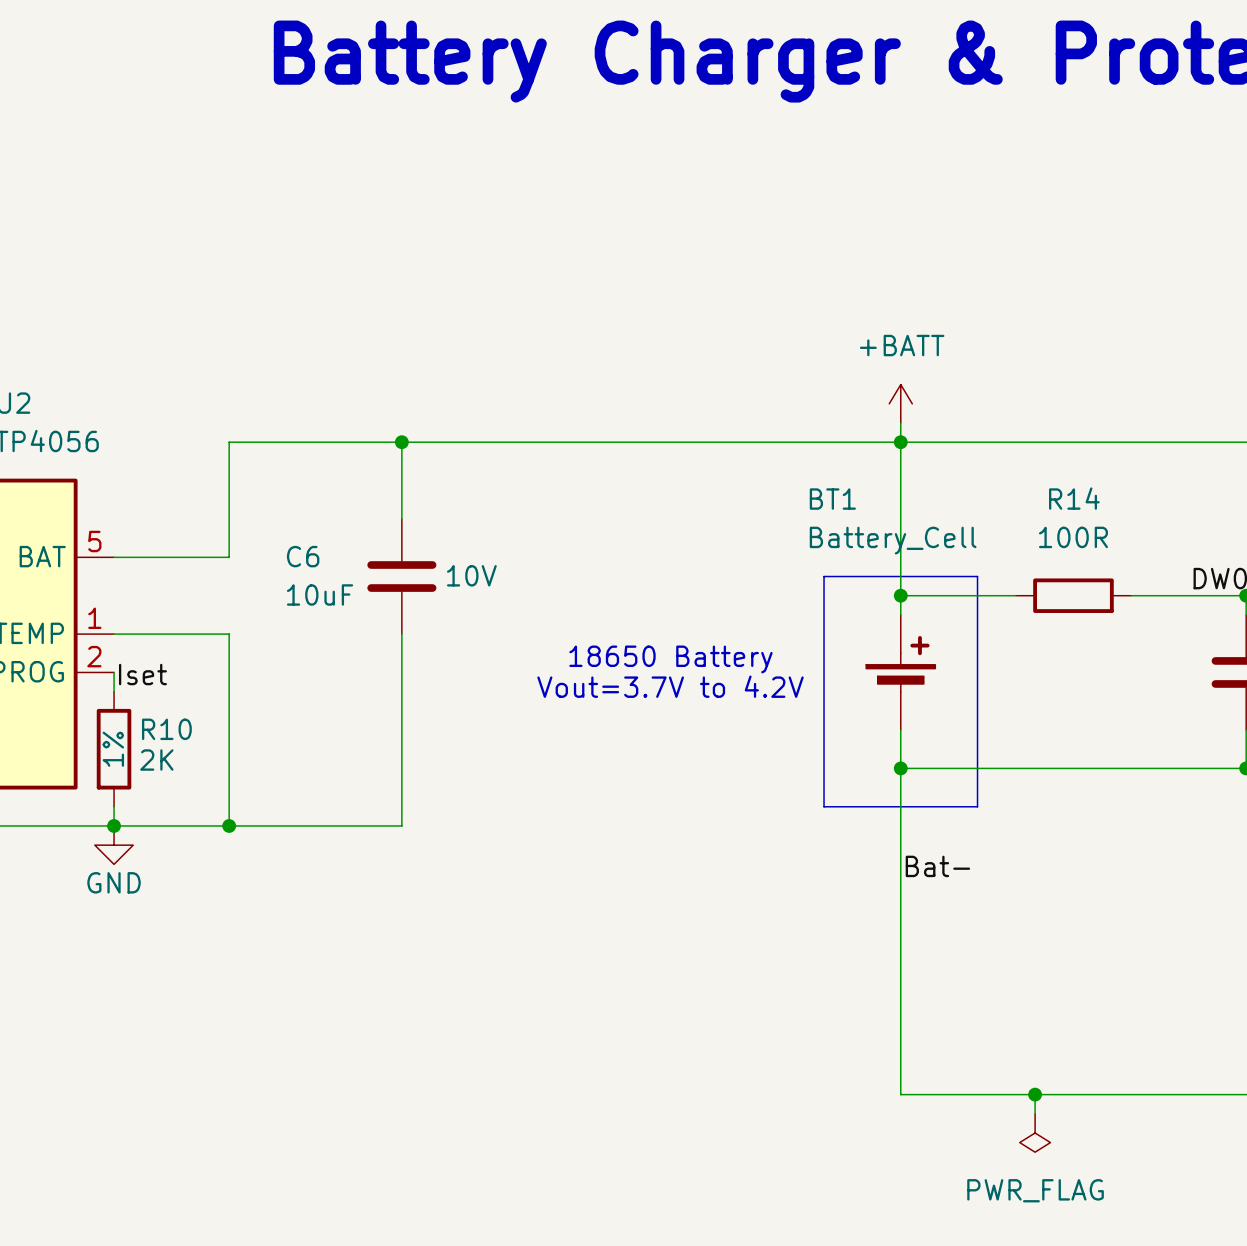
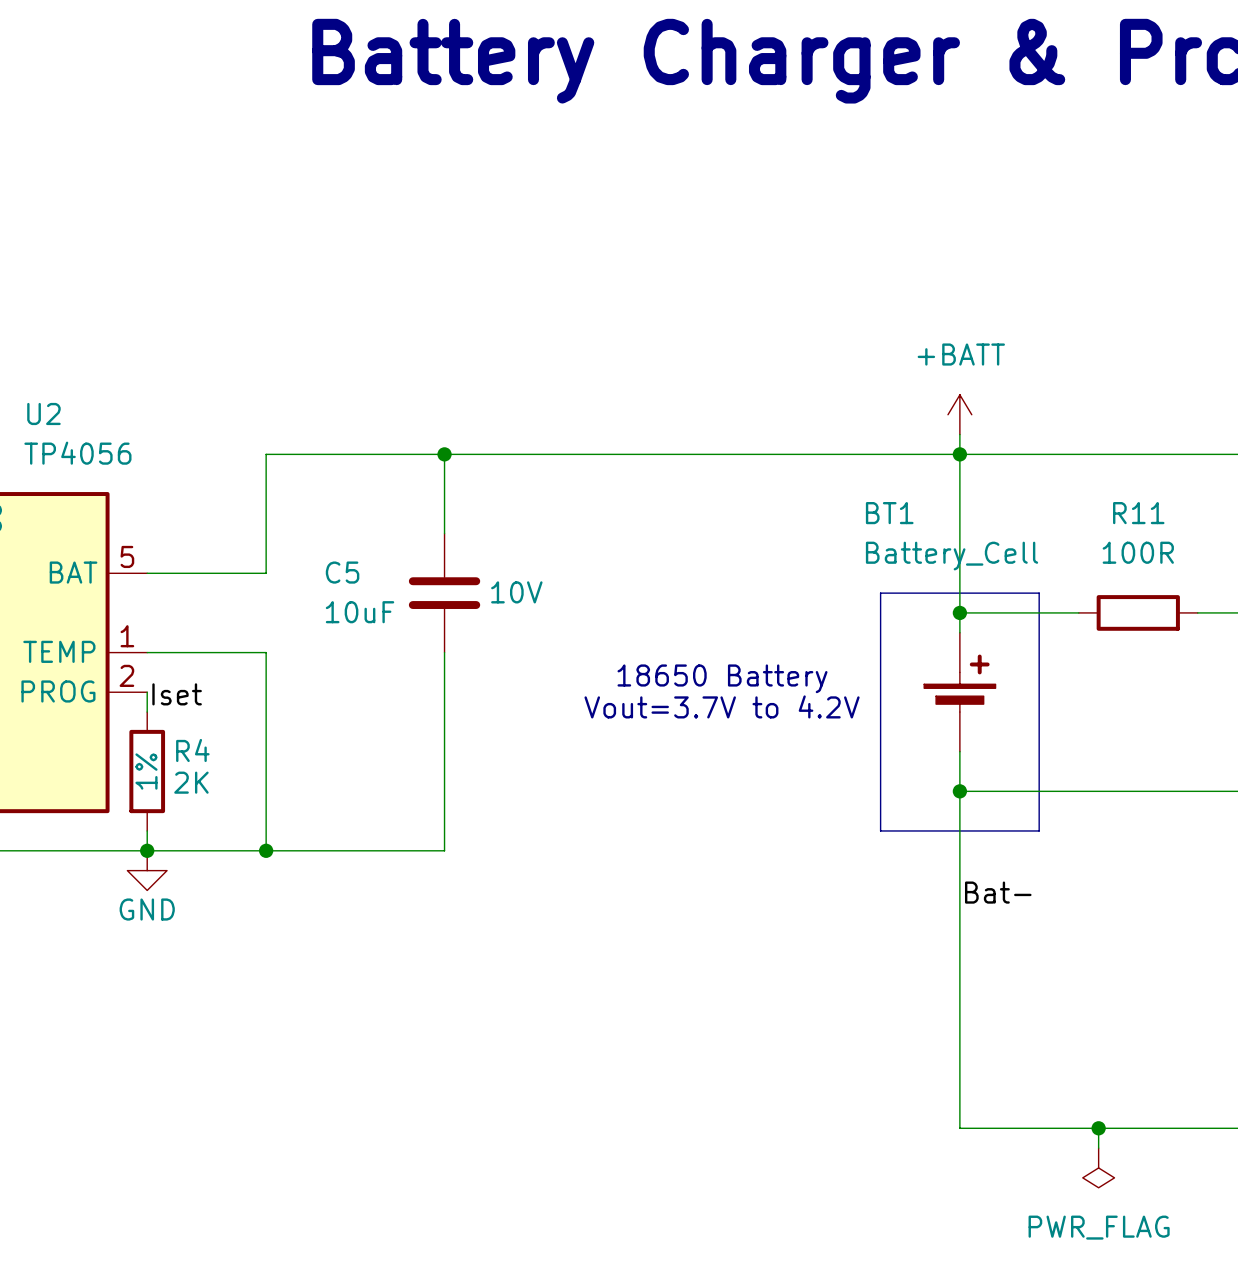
R14 name: R14 (1074, 498) -> R11 (1138, 513)
C6 name: C6 (303, 556) -> C5 (342, 572)
R10 name: R10 (166, 729) -> R4 (192, 750)

